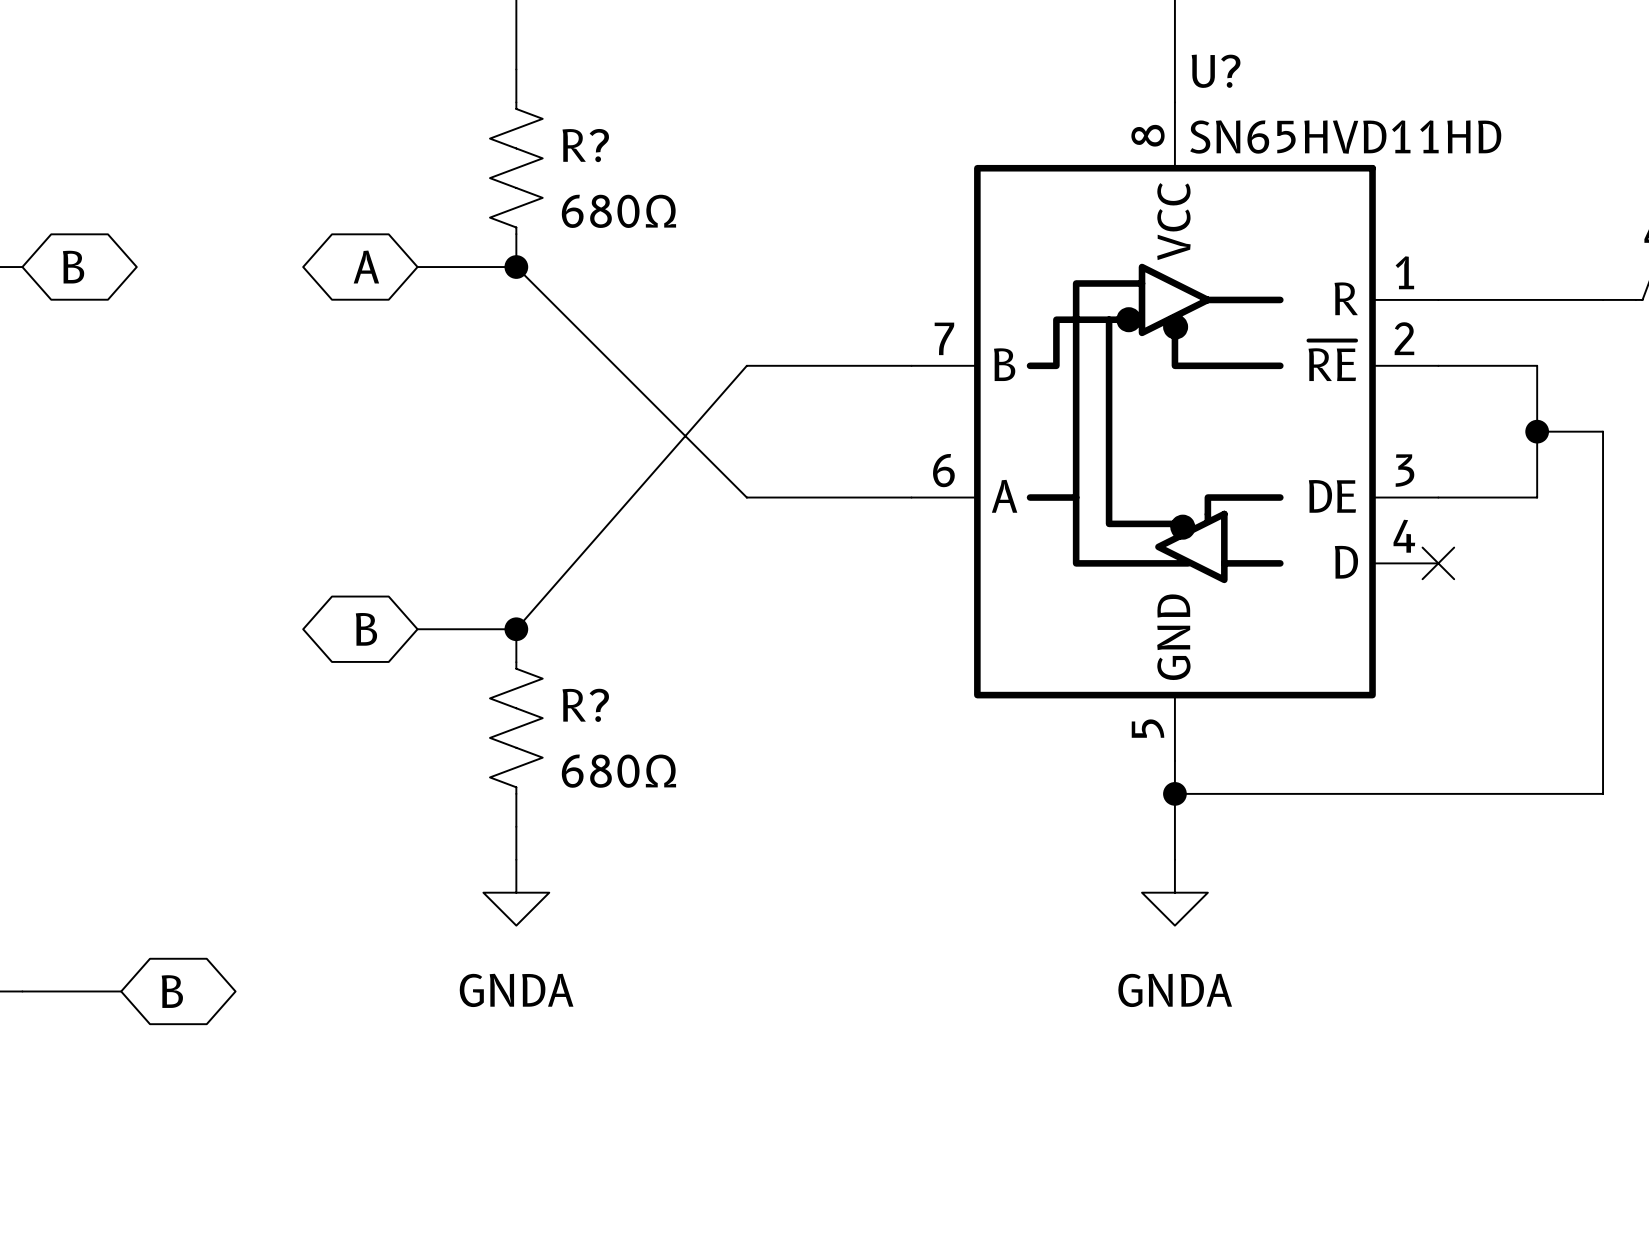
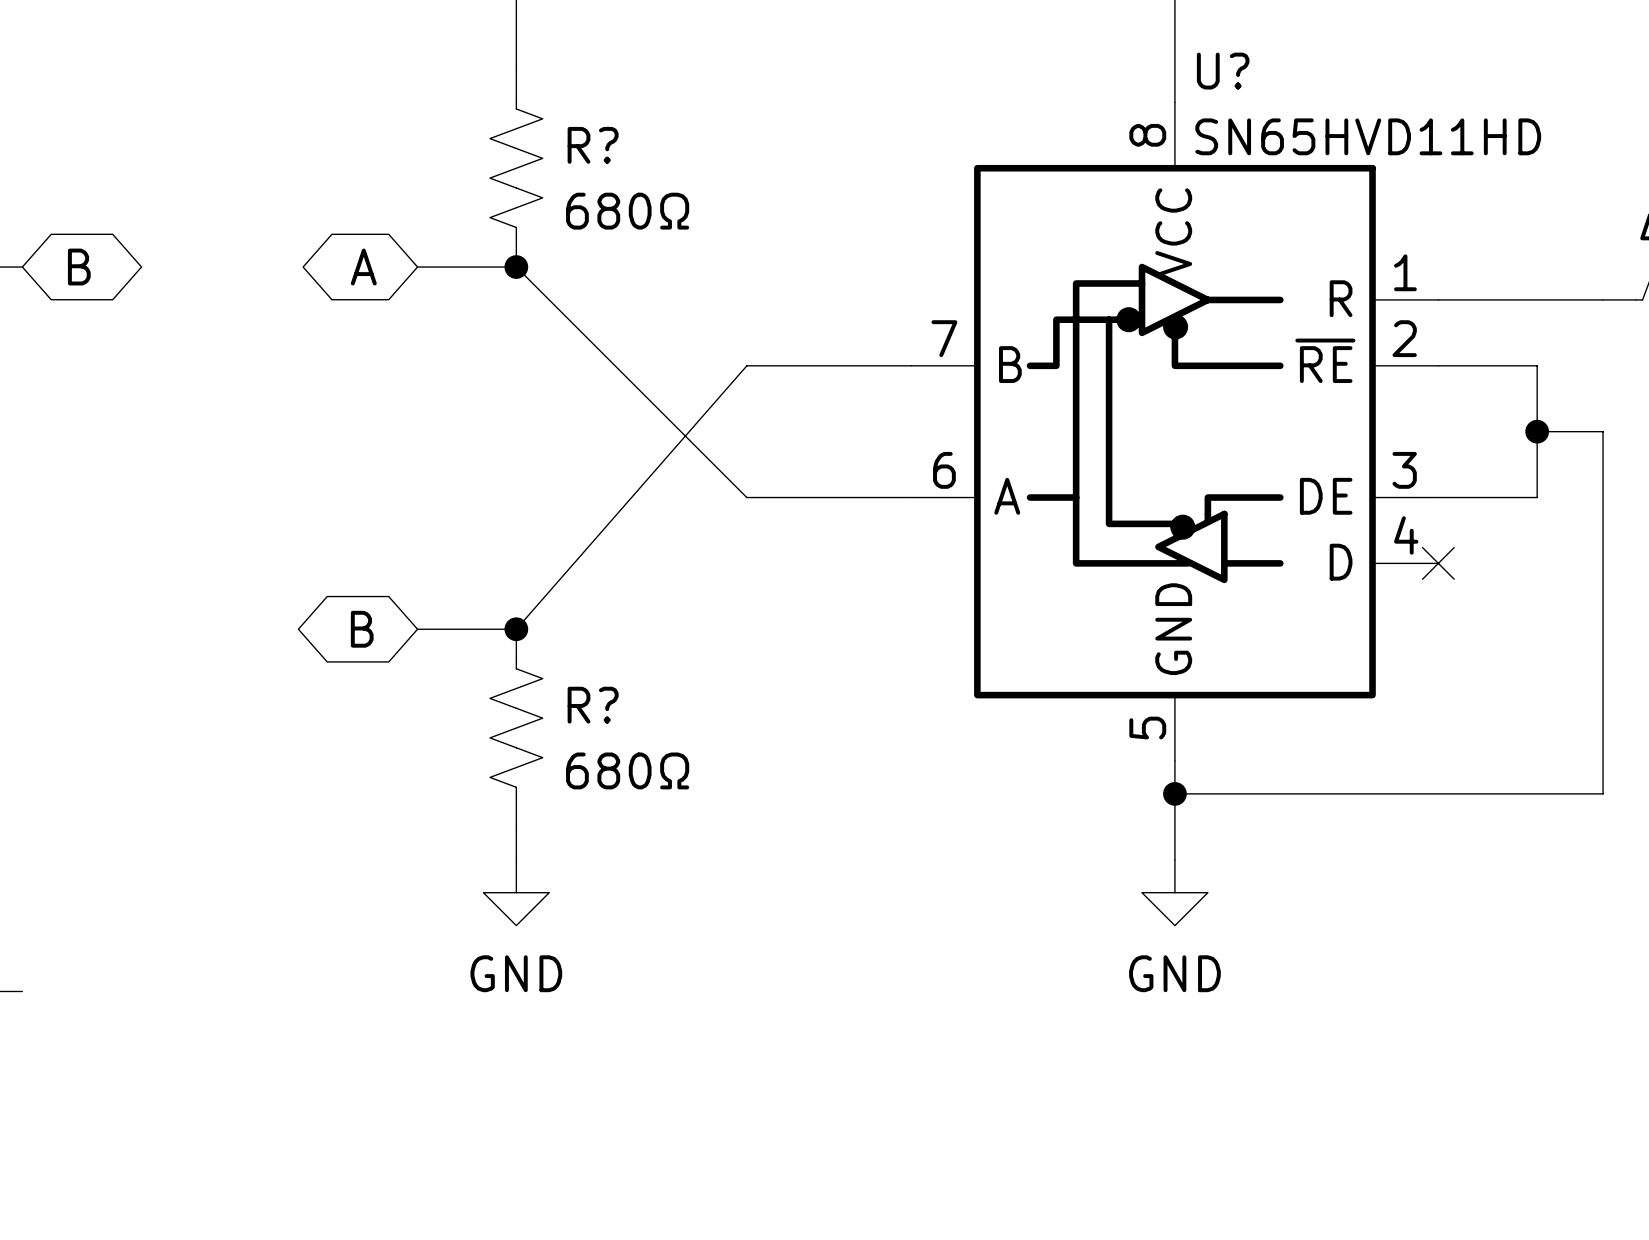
power symbol: GNDA (516, 892) -> GND (516, 892)
power symbol: GNDA (1174, 892) -> GND (1174, 892)
wire: (22, 991) (121, 991) -> none
global label: B (172, 991) -> none

